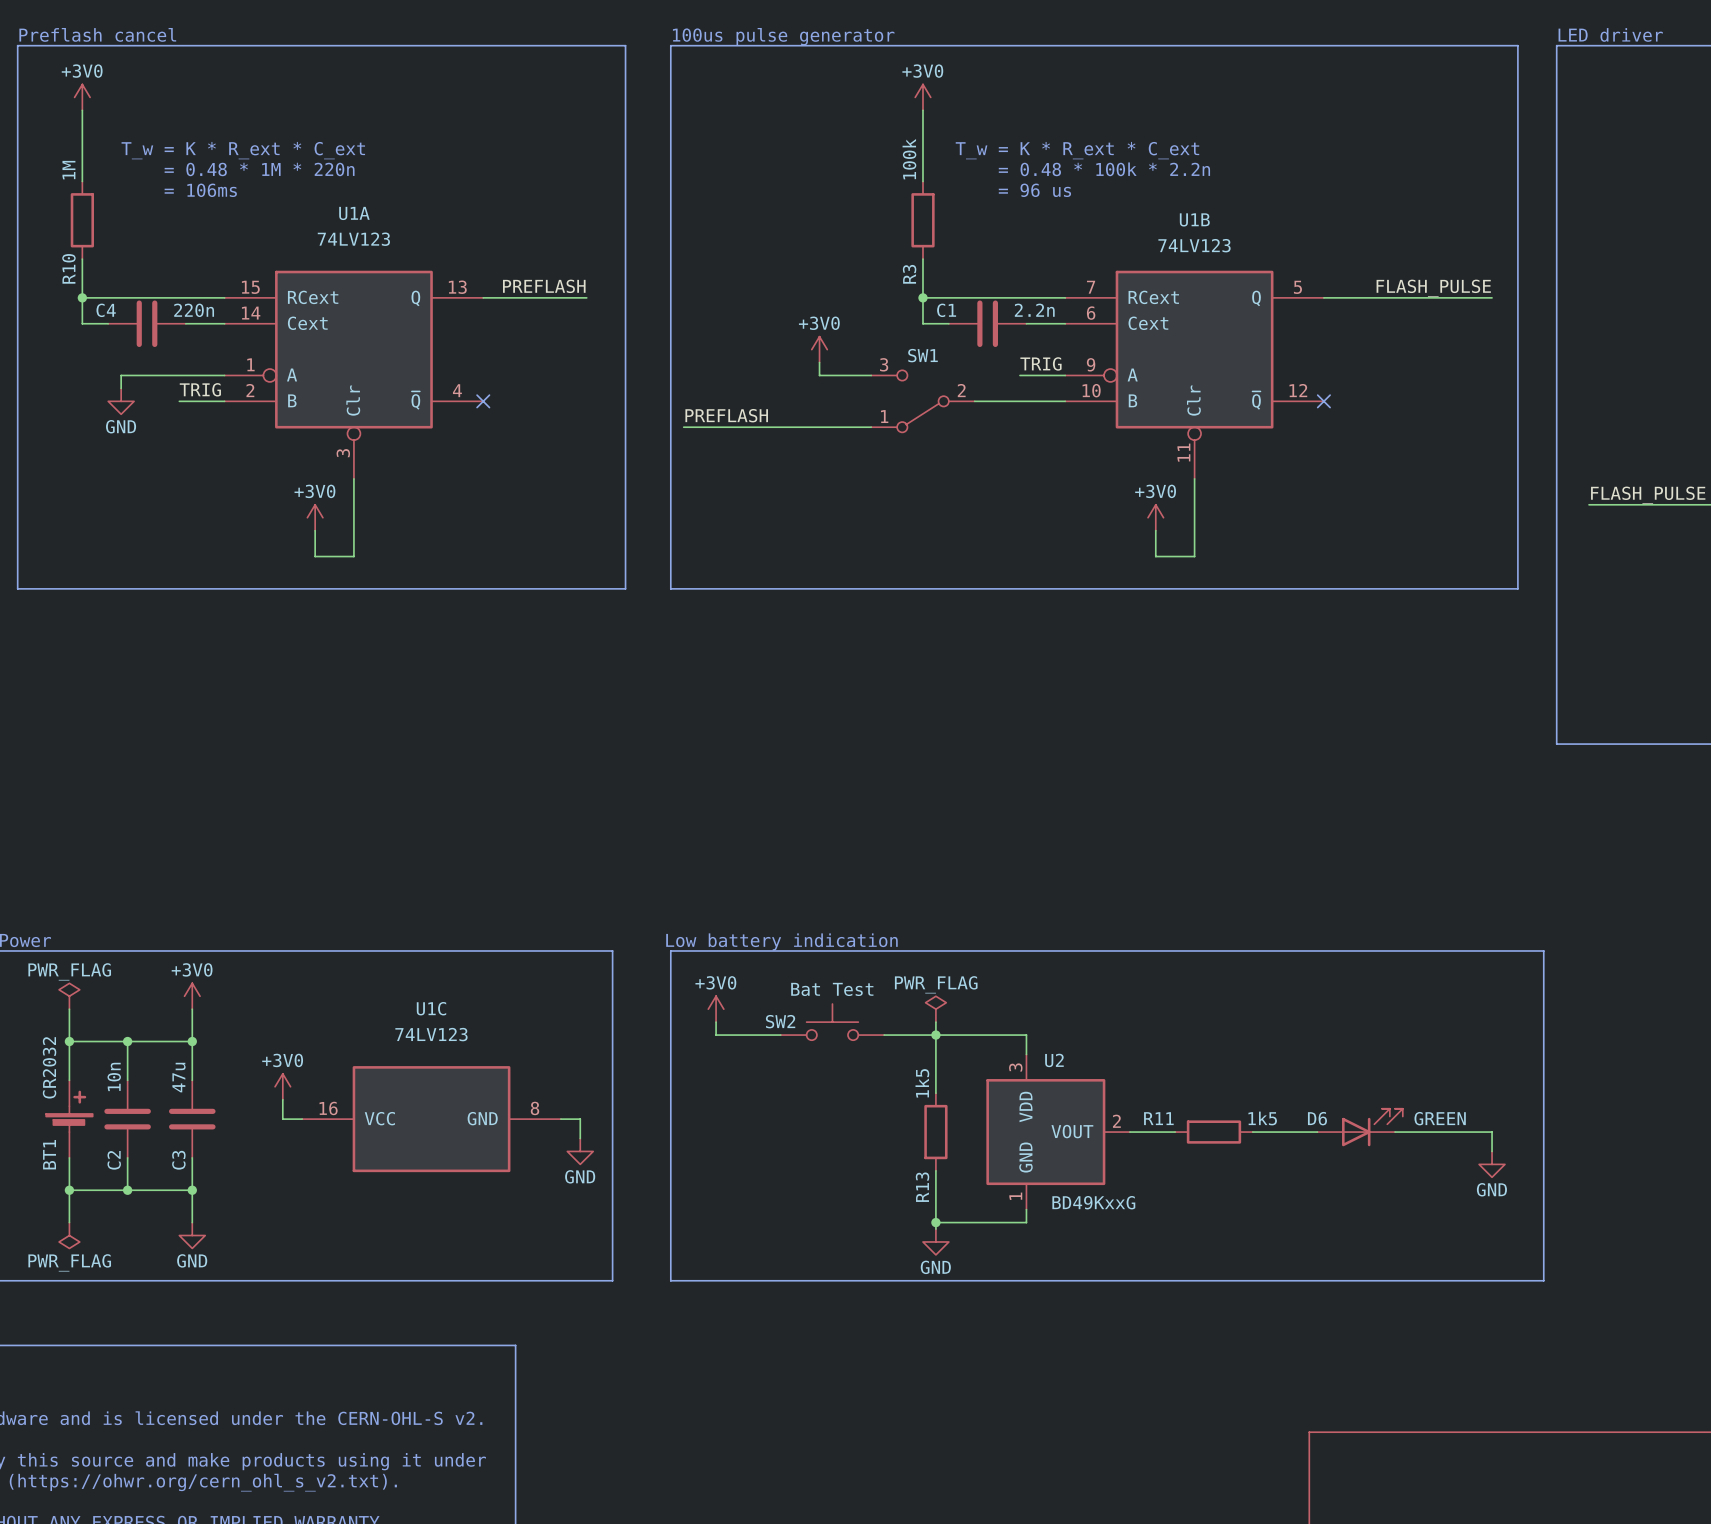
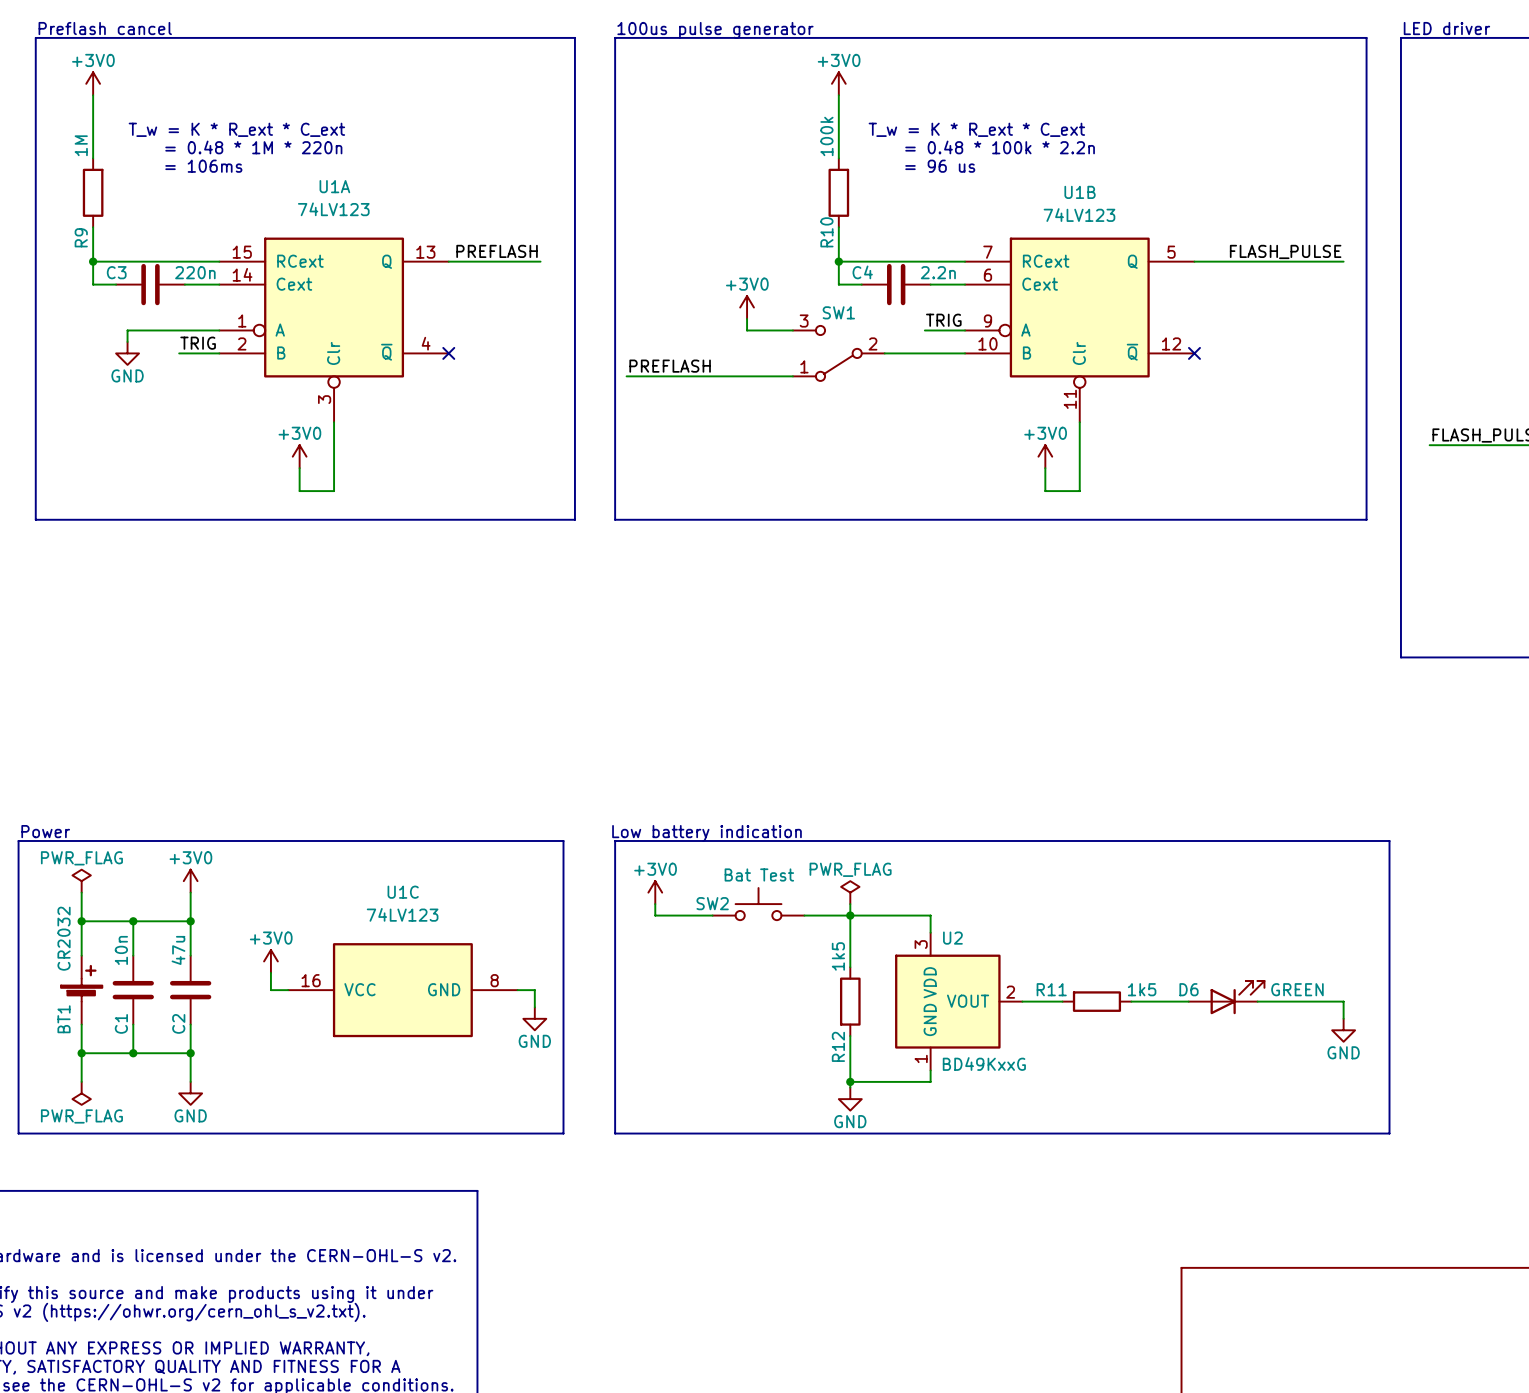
R10 name: R10 (68, 268) -> R9 (81, 237)
R3 name: R3 (909, 274) -> R10 (826, 232)
C4 name: C4 (106, 310) -> C3 (116, 272)
C1 name: C1 (946, 310) -> C4 (862, 272)
C2 name: C2 (114, 1160) -> C1 (121, 1023)
C3 name: C3 (178, 1160) -> C2 (178, 1023)
R13 name: R13 (922, 1187) -> R12 (838, 1046)

